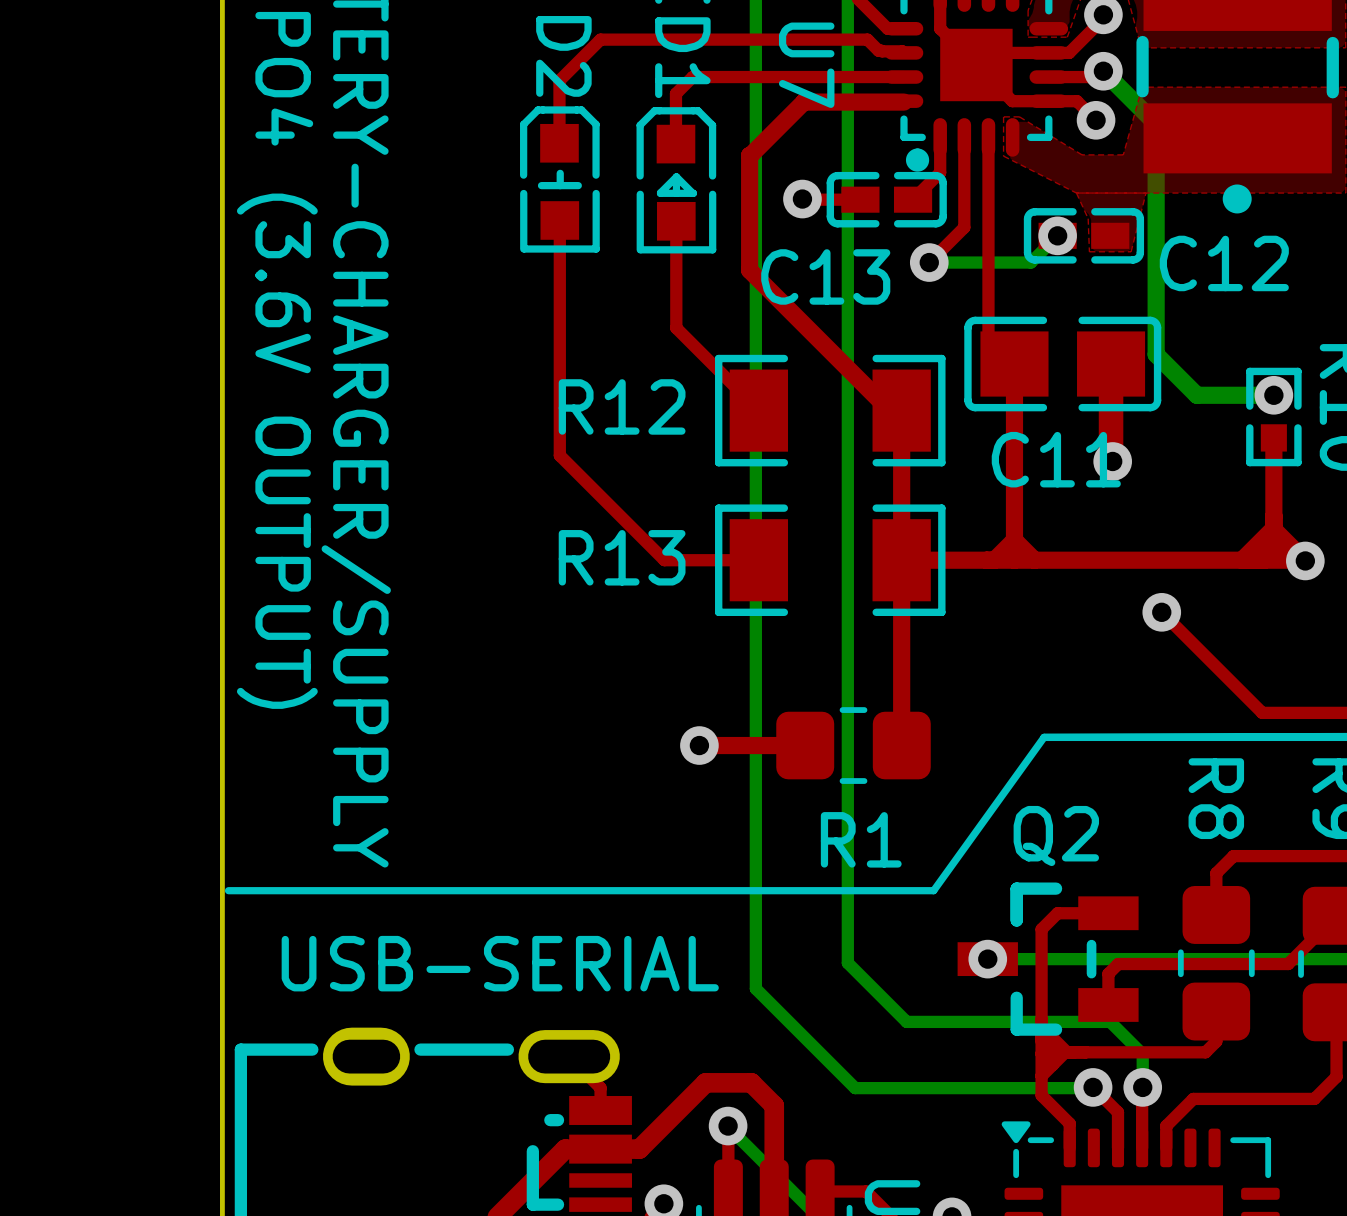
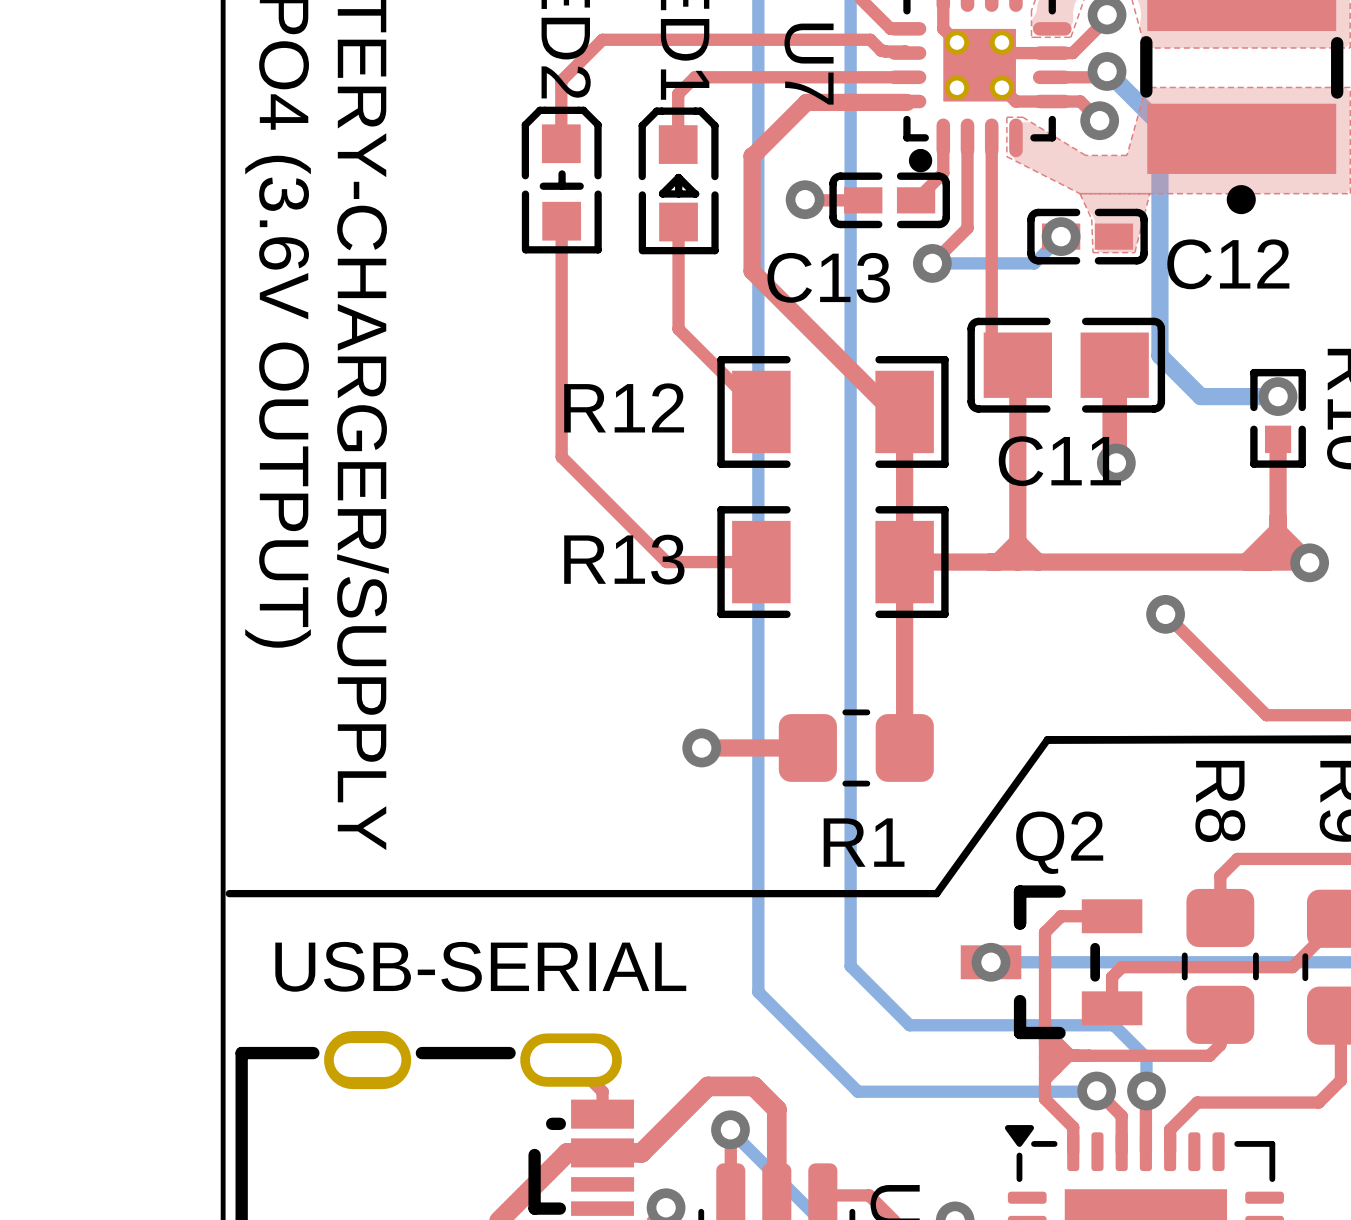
part: none -> (956, 42)
part: none -> (1001, 42)
part: none -> (956, 87)
part: none -> (1001, 87)

